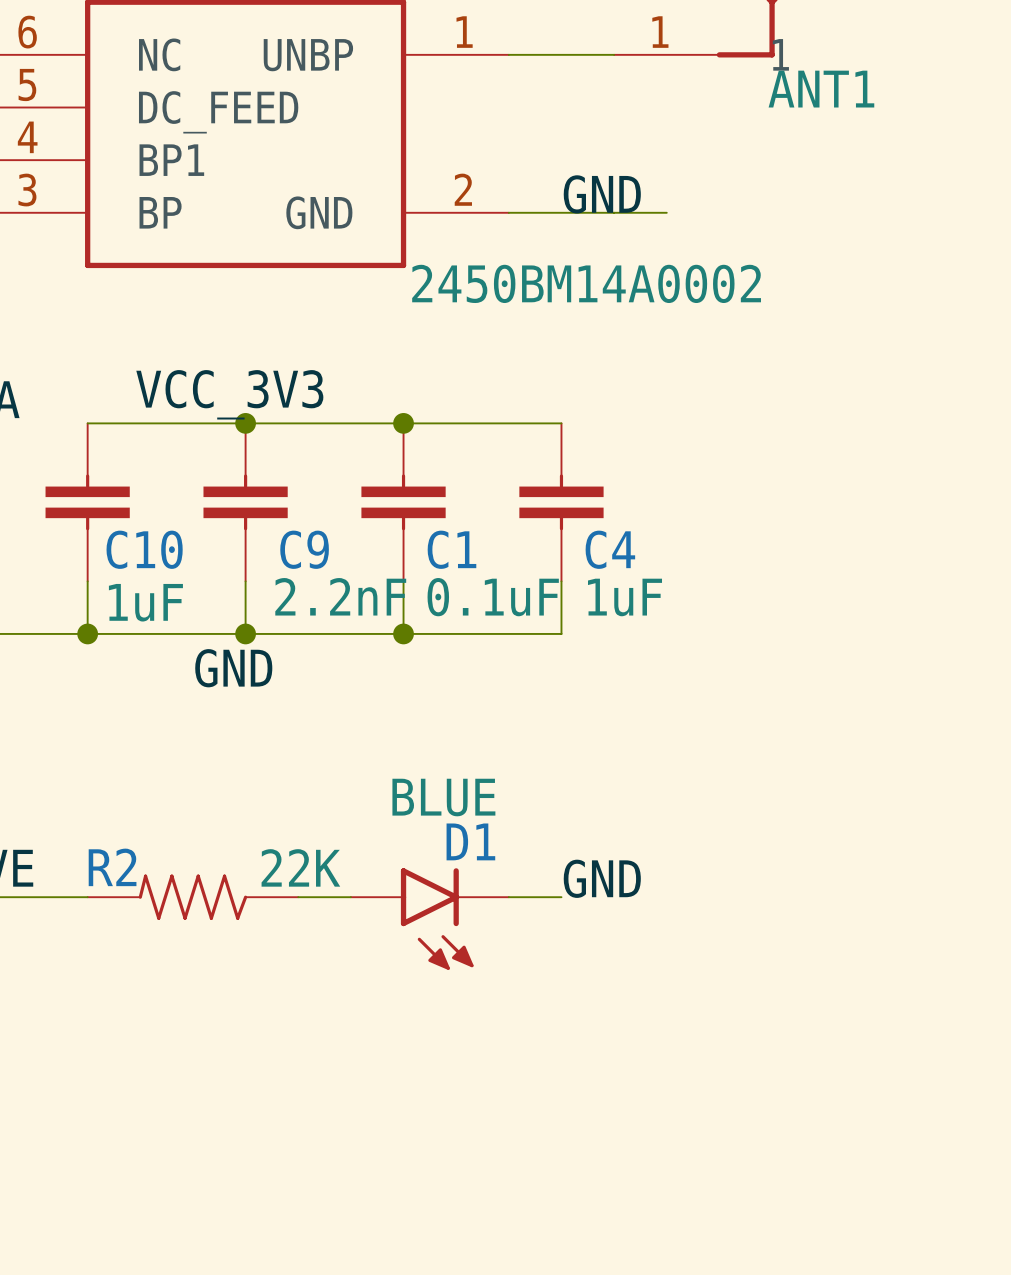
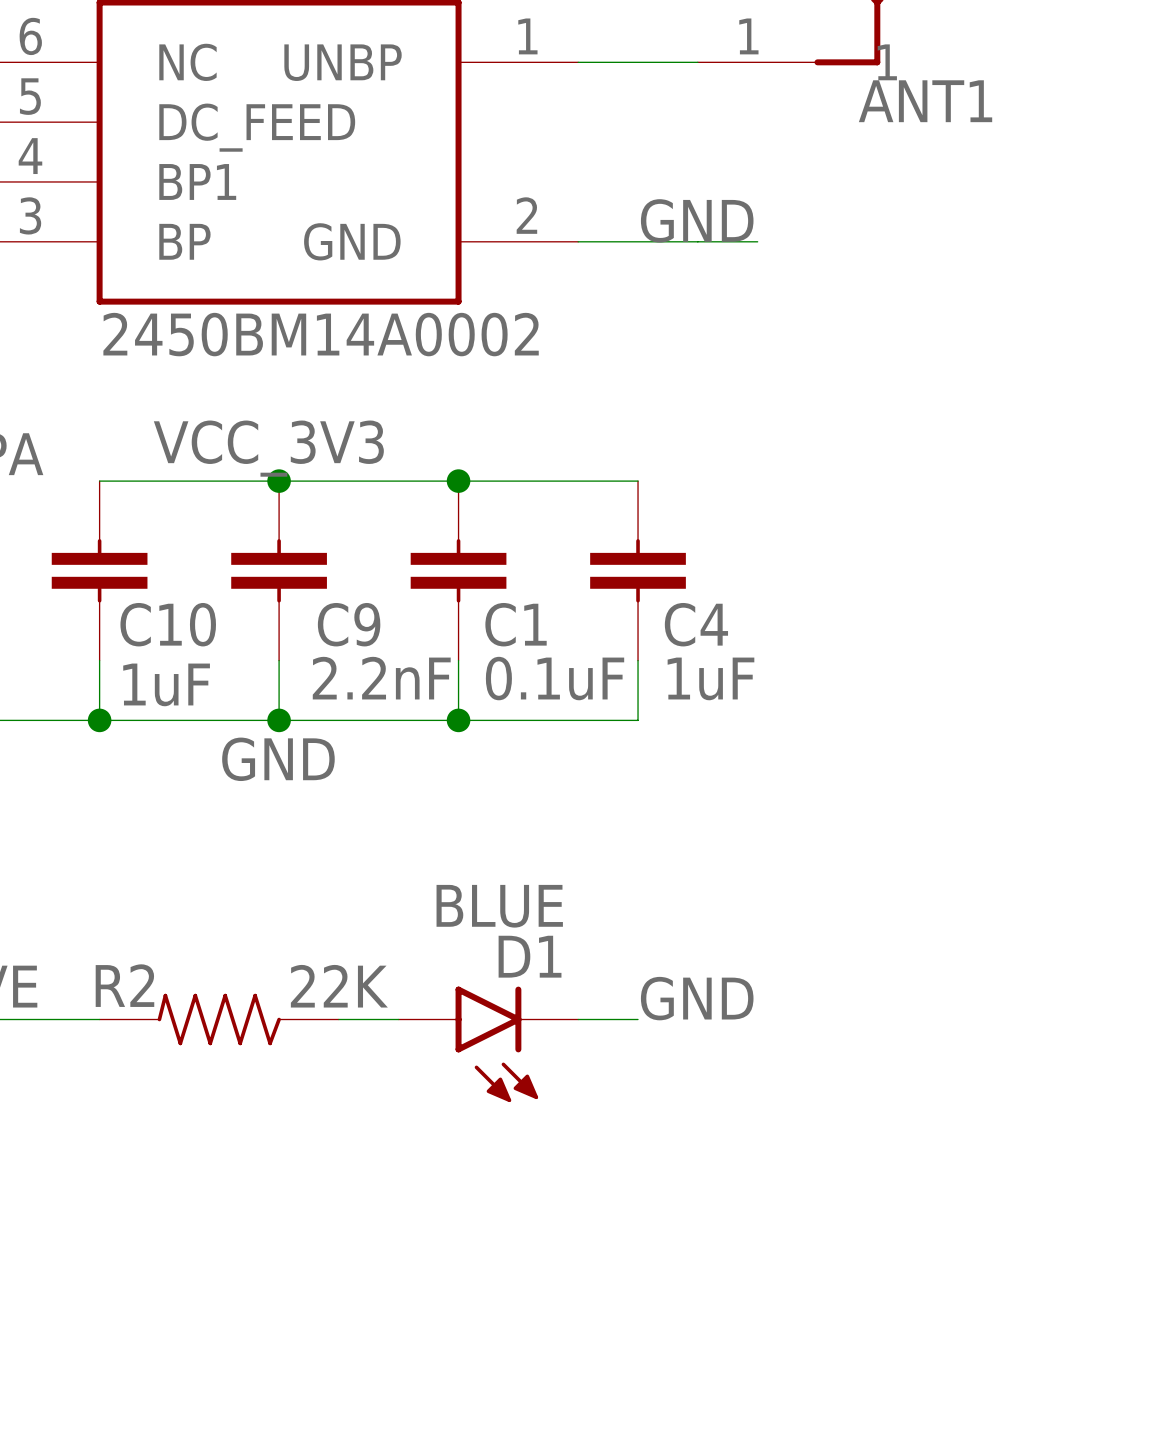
part value position: 2450BM14A0002 (586, 283) -> 2450BM14A0002 (321, 334)

